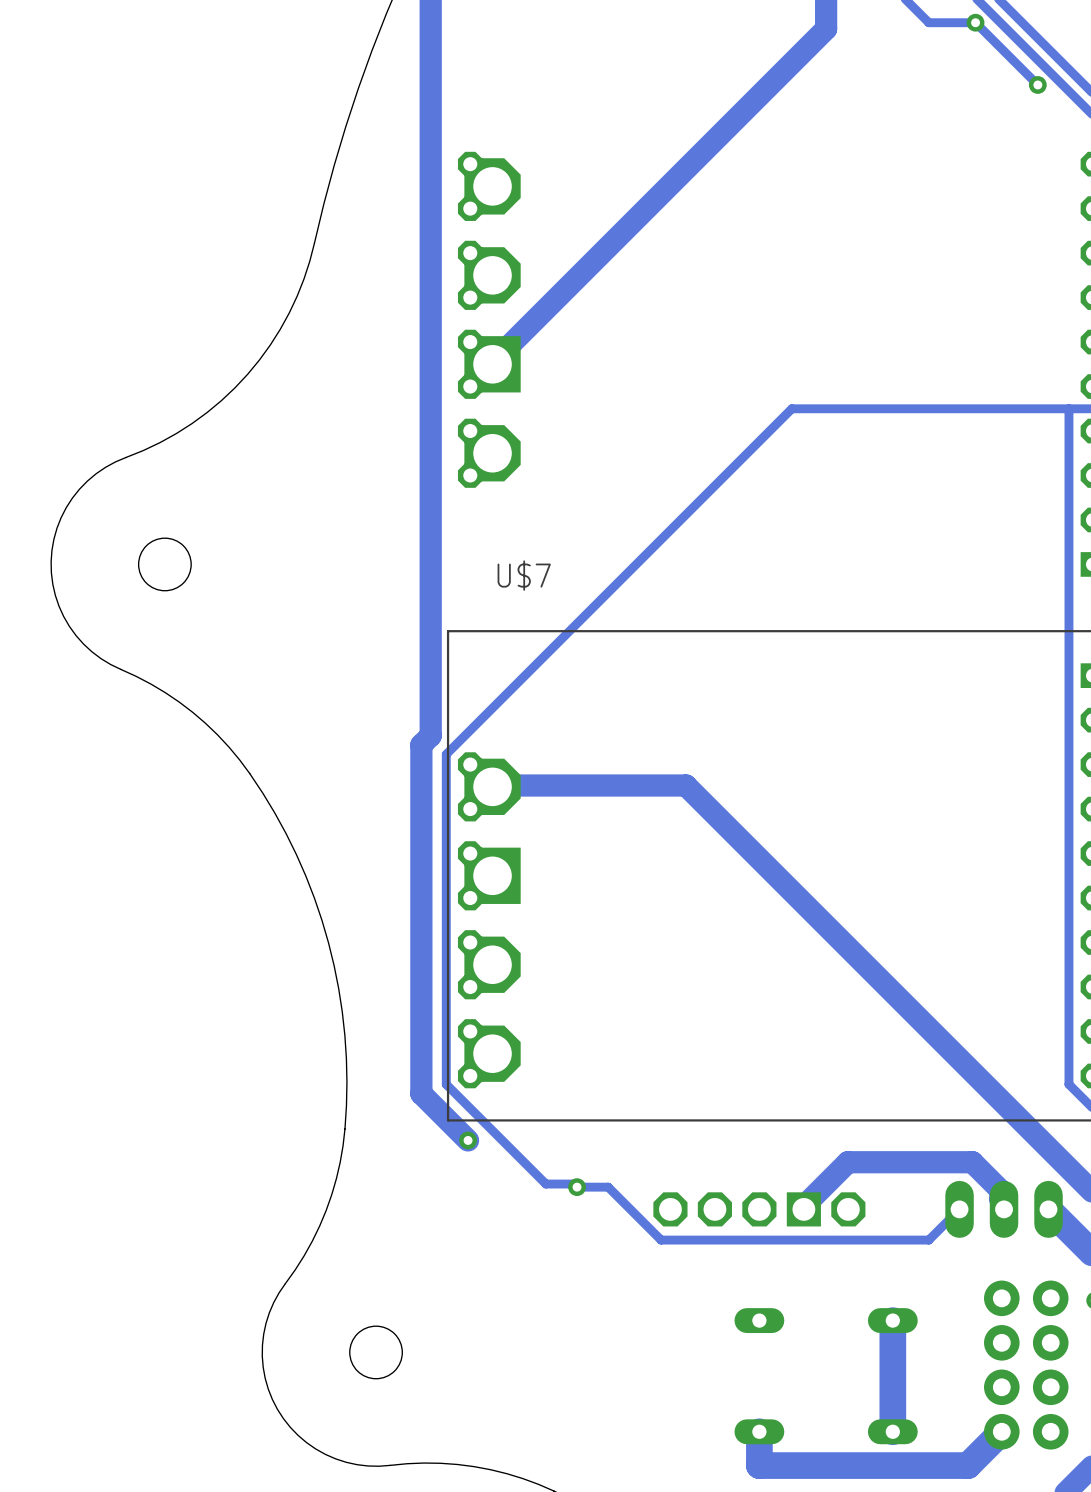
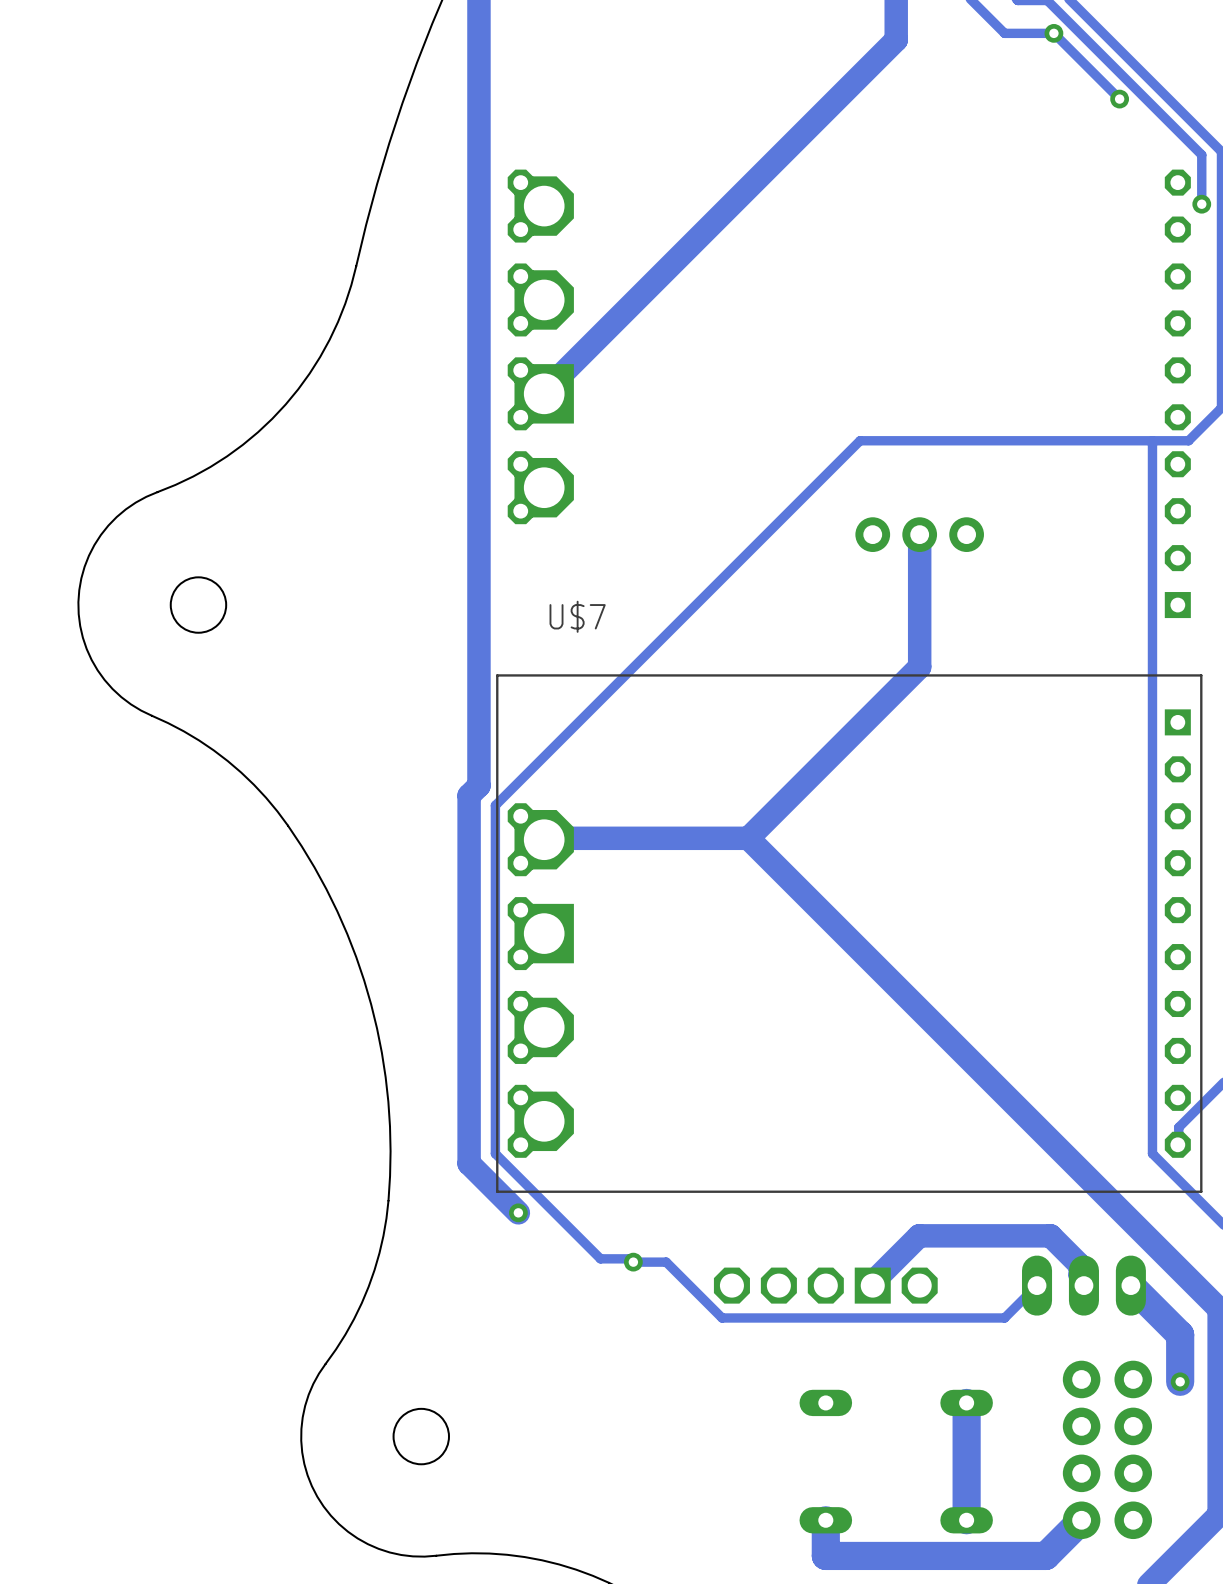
track: none -> (919, 534) (919, 666) (748, 838)
part: none -> (919, 534)

